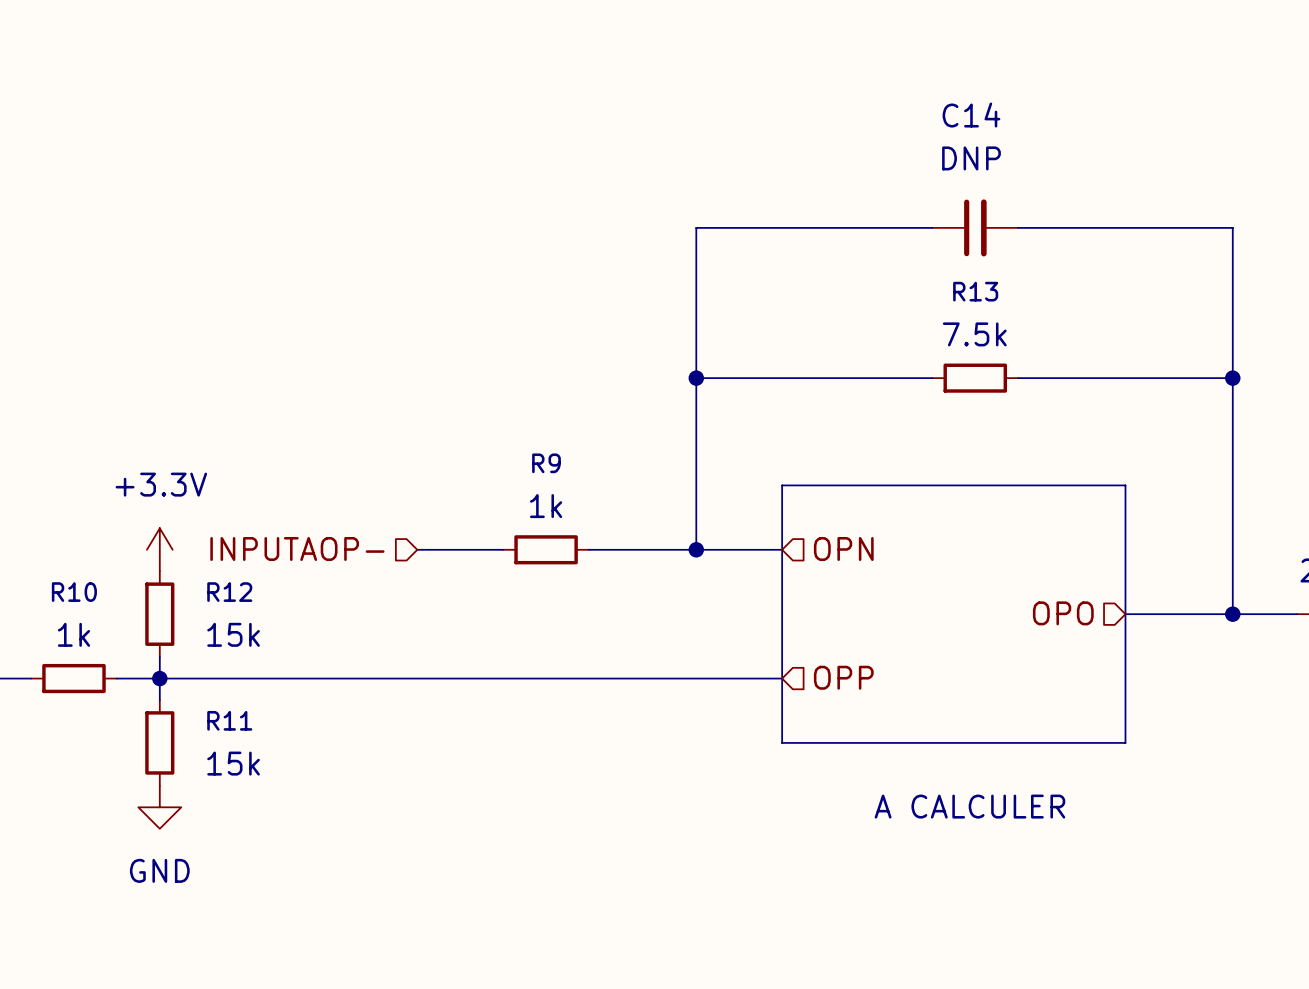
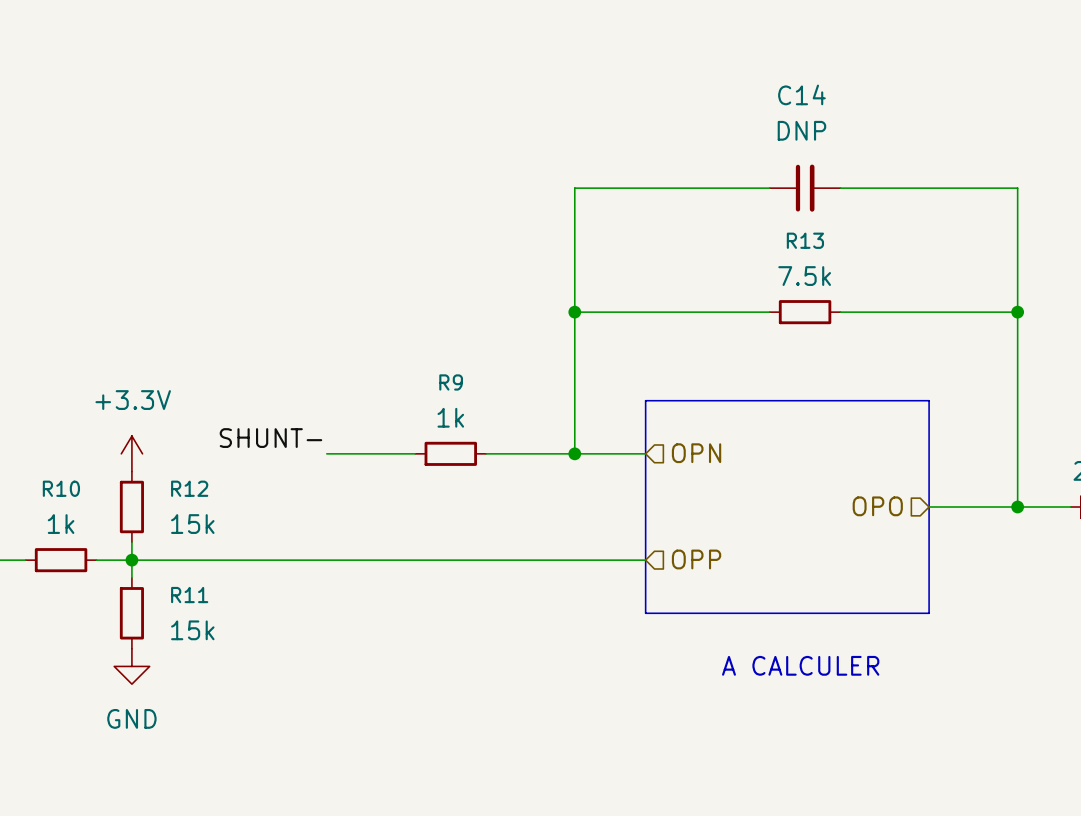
label: none -> SHUNT- (270, 438)
hierarchical label: INPUTAOP- (297, 549) -> none
wire: none -> (326, 453) (344, 453)

